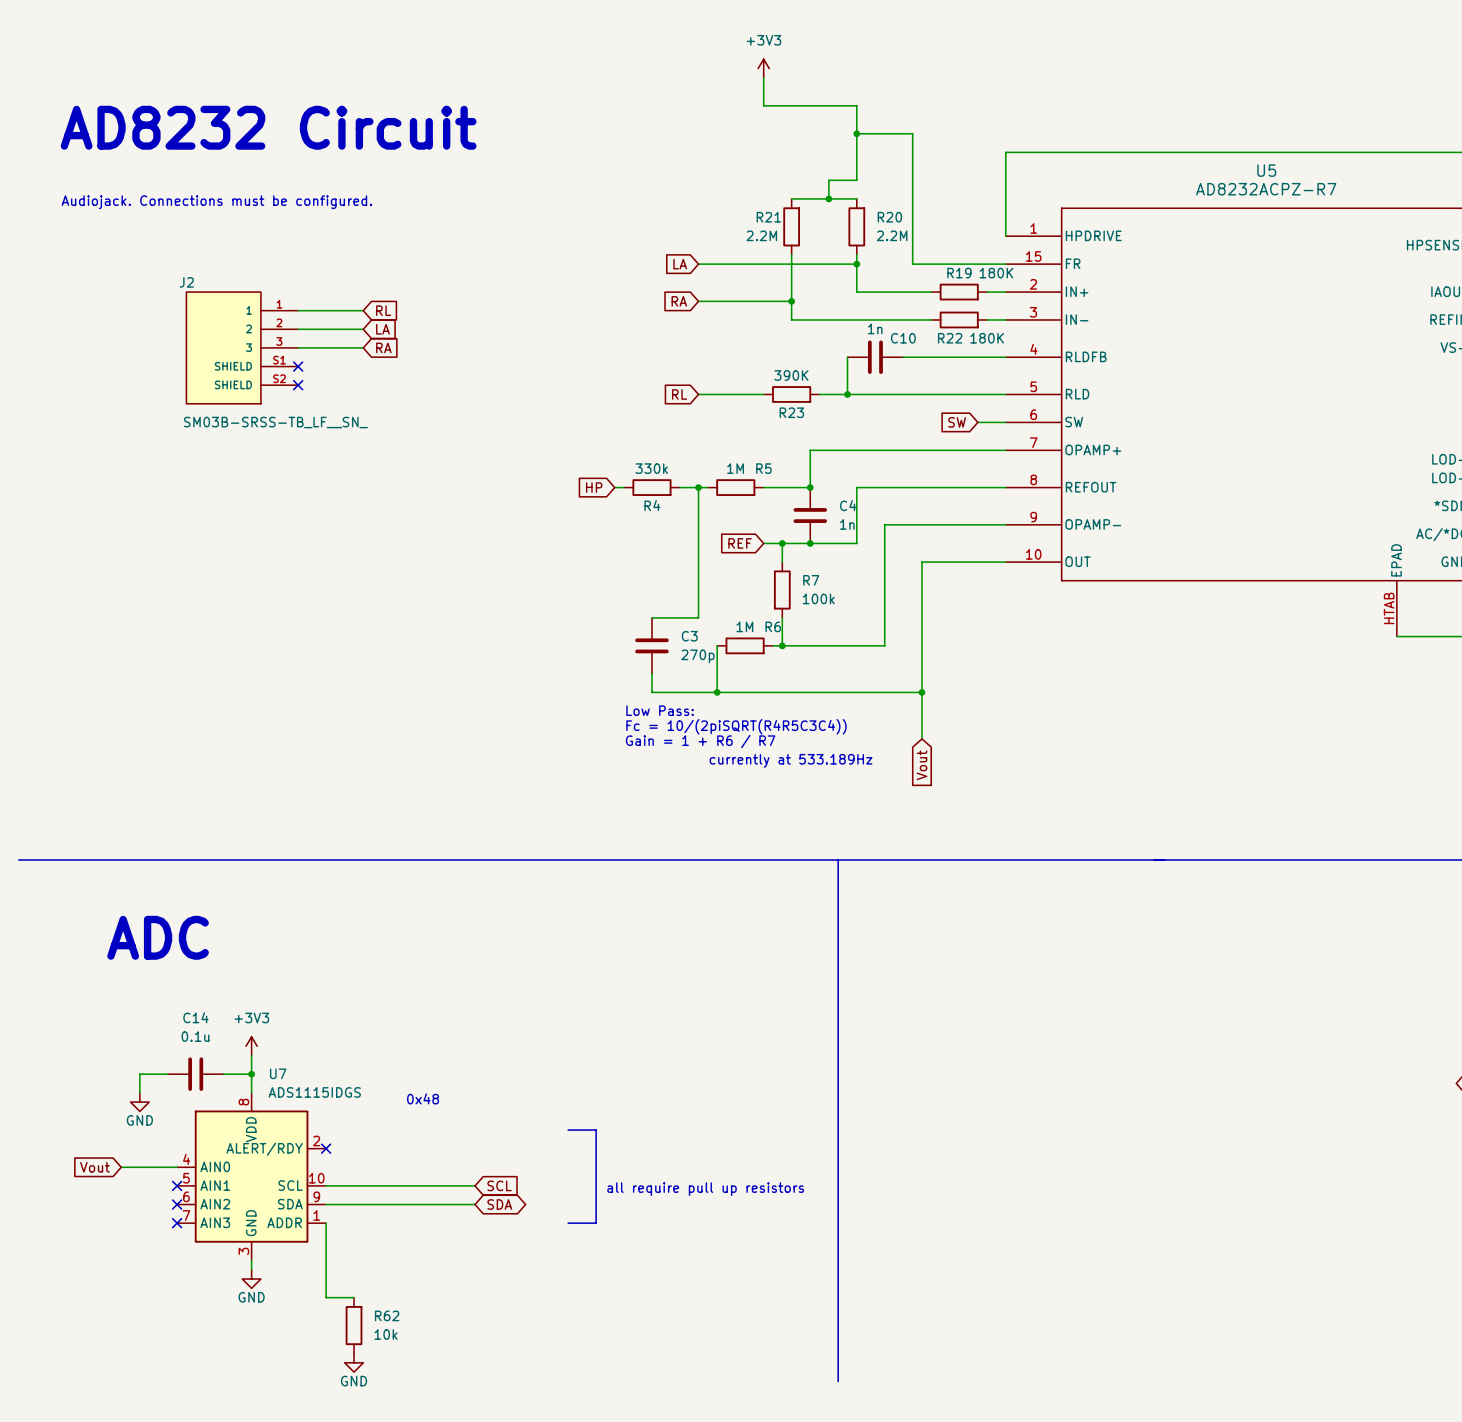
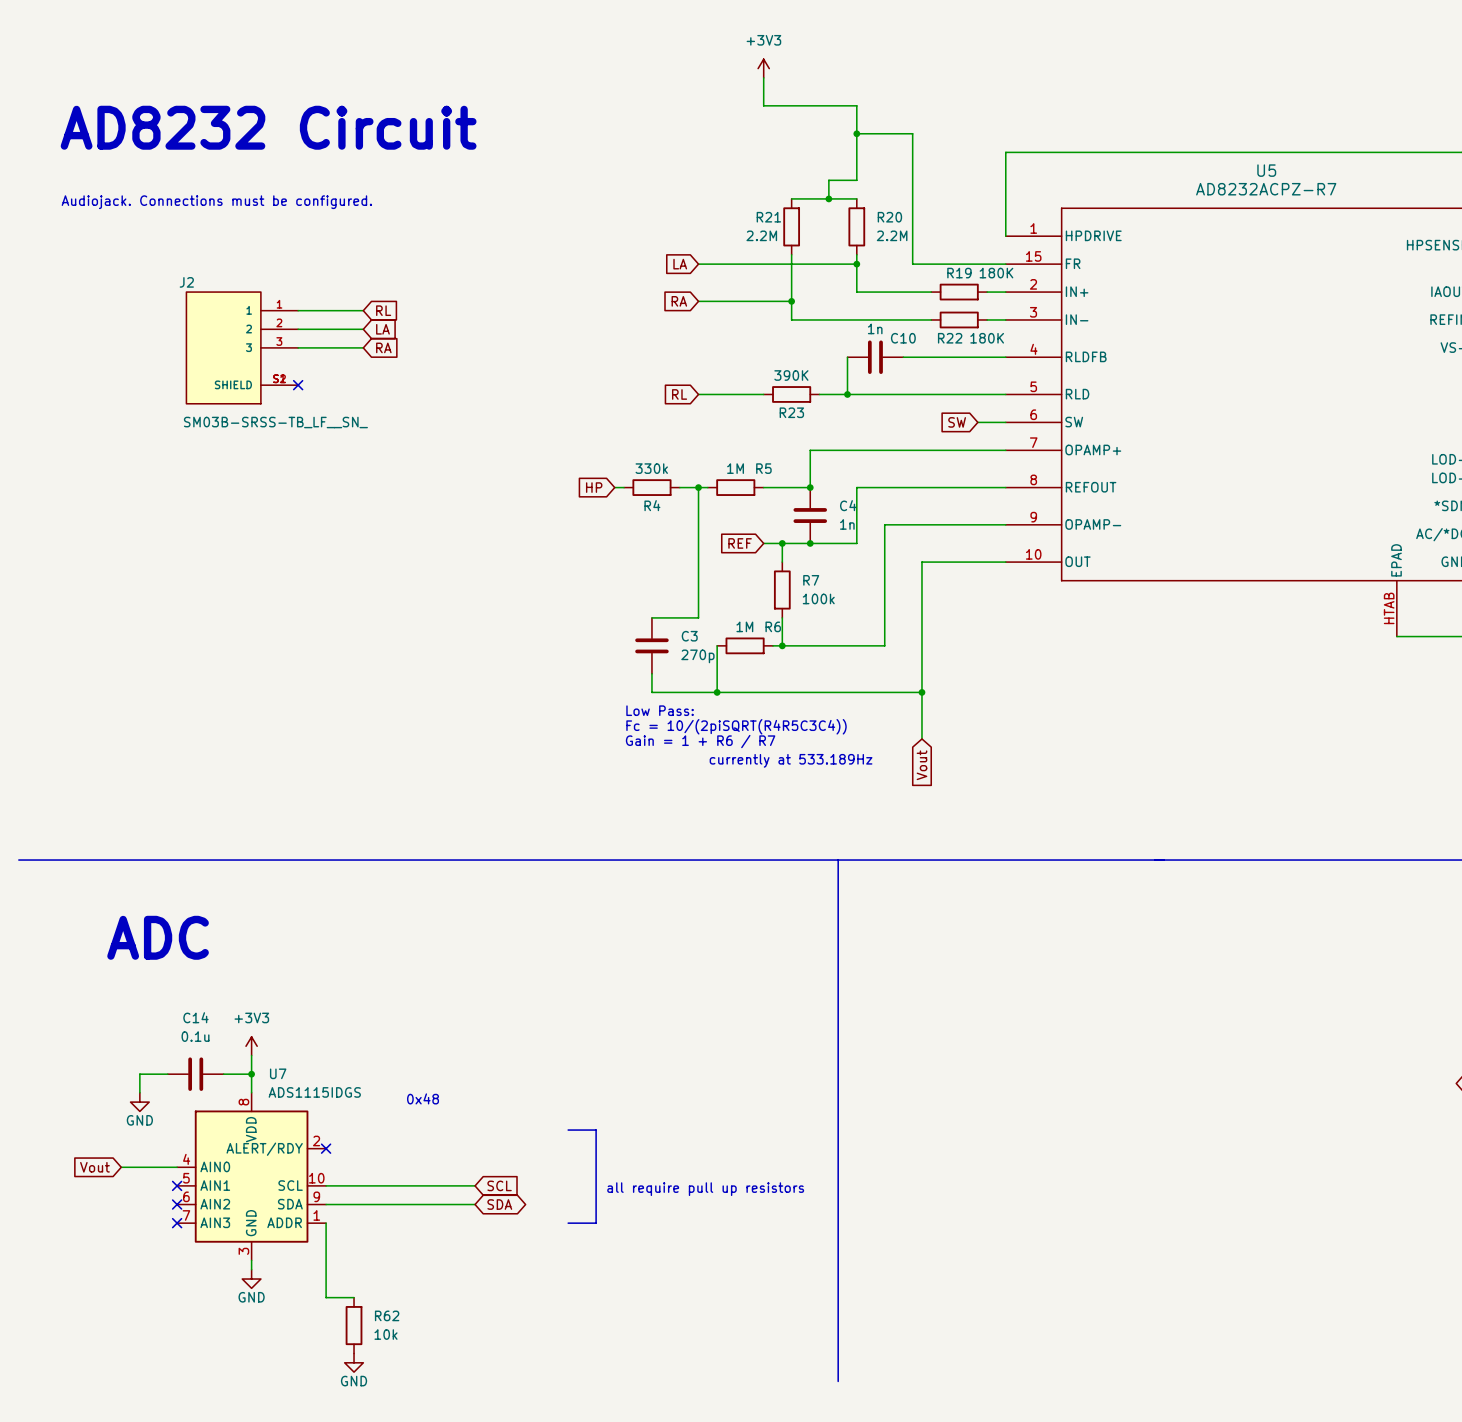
J2 symbol: [185, 291, 299, 405] -> [185, 291, 299, 405]
no-connect mark: (298, 366) -> none

